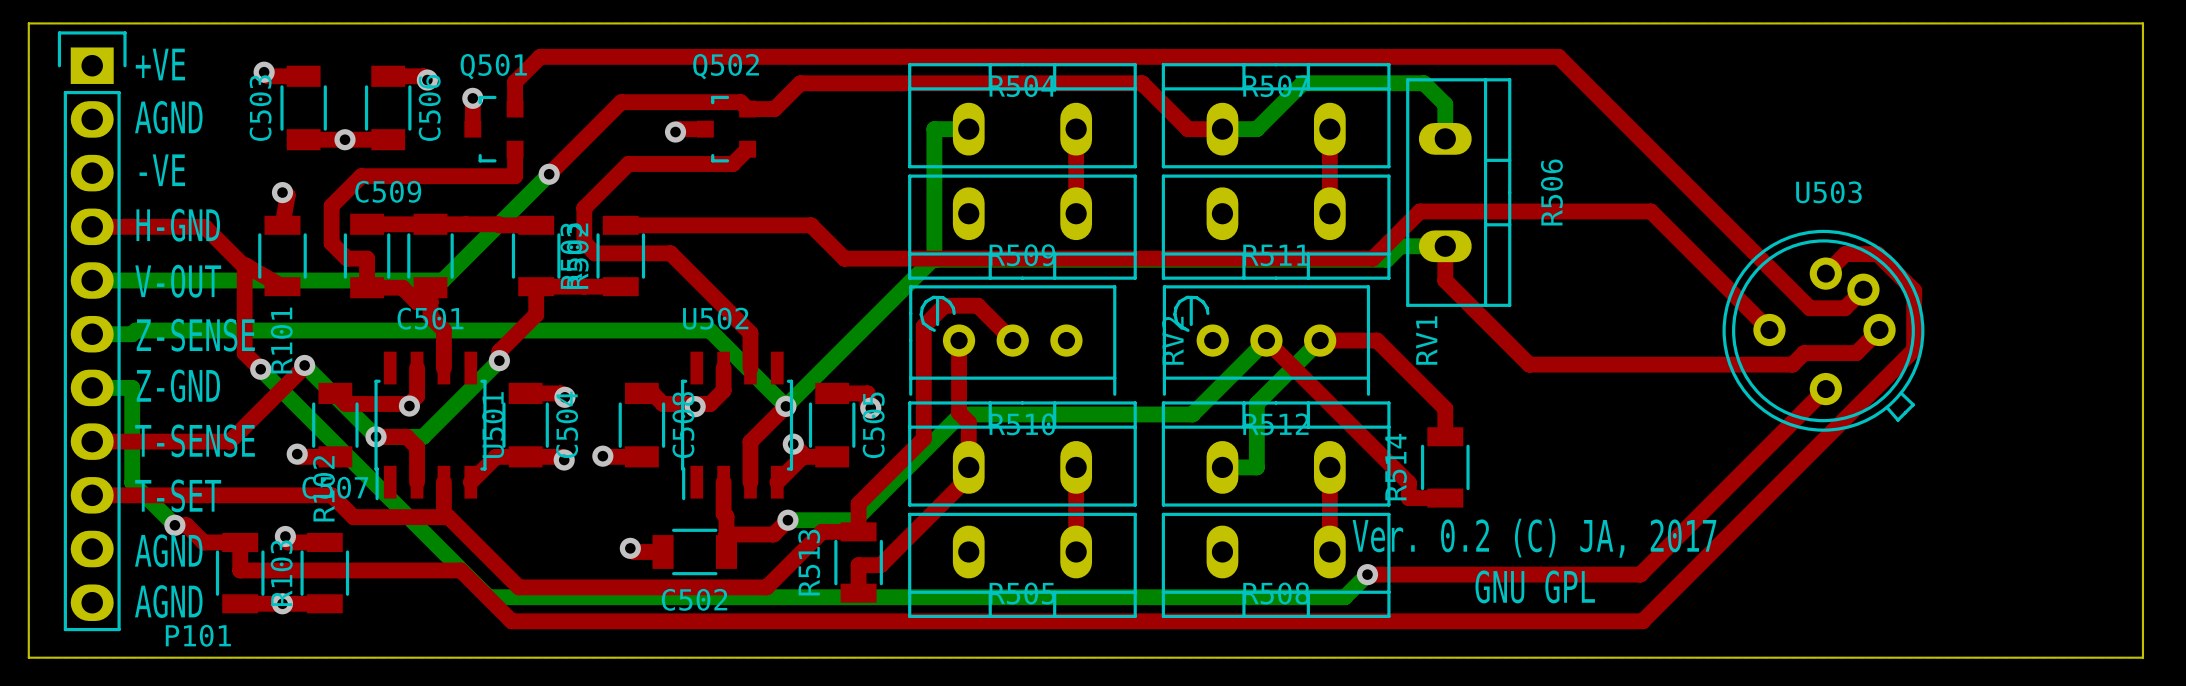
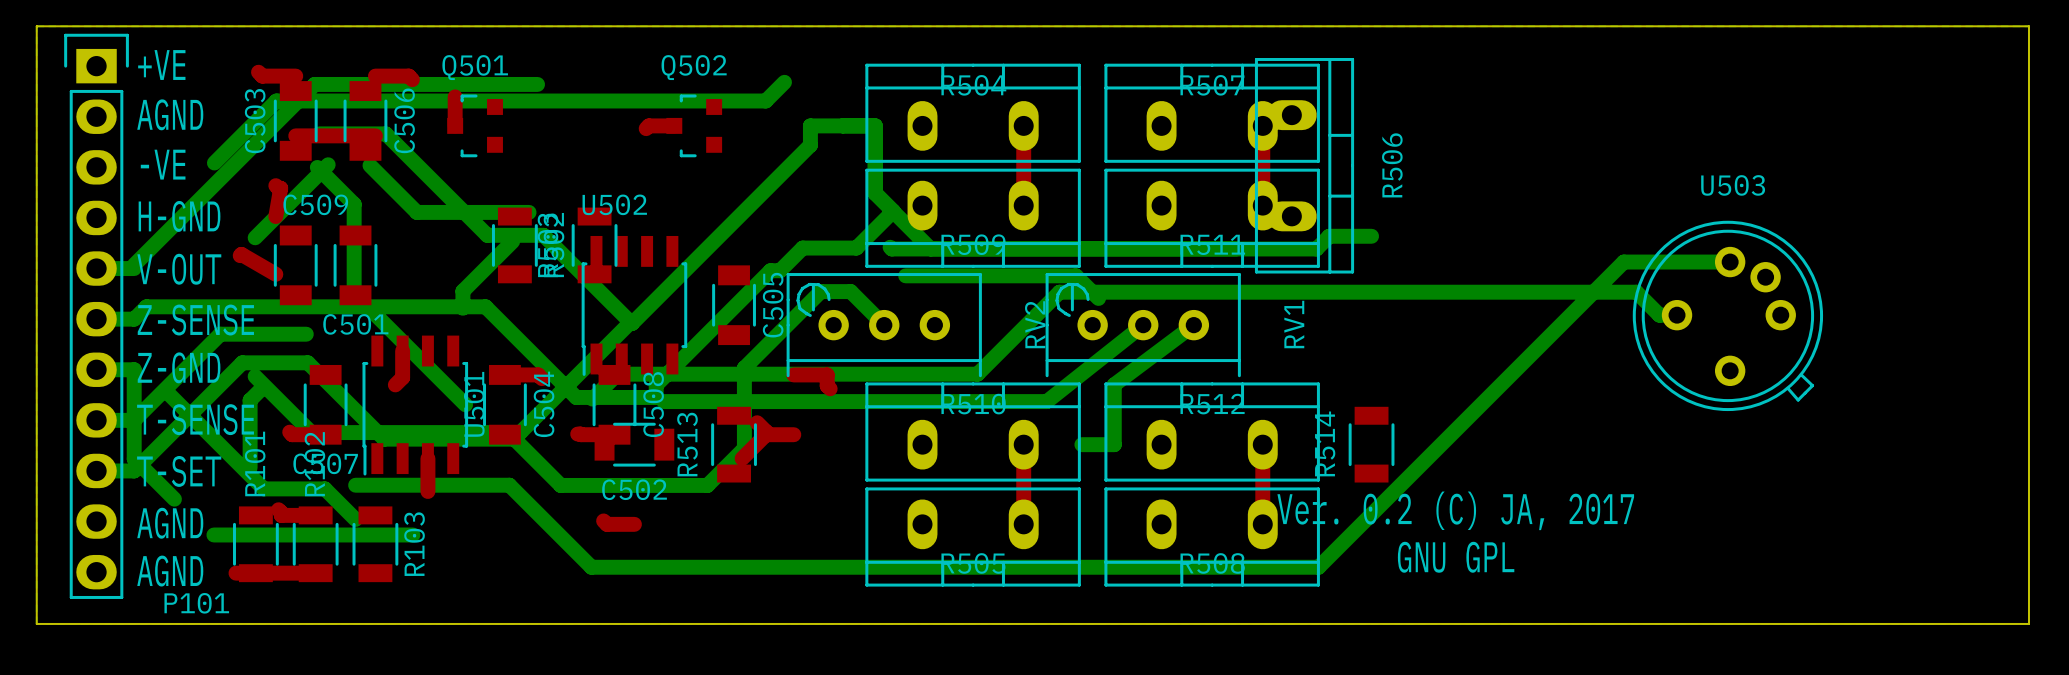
via: (264, 72) -> none
via: (427, 80) -> none
bottom track: none -> (784, 82) (765, 100) (276, 100) (214, 162)
bottom track: none -> (537, 84) (314, 84) (134, 264)
via: (472, 98) -> none
C503 position: (303, 108) -> (295, 120)
C506 position: (388, 108) -> (365, 120)
top track: (515, 109) (515, 82) (540, 56) (1558, 56) (1809, 308) (1844, 308) (1863, 289) -> none
bottom track: (968, 129) (934, 129) (934, 257) (785, 406) (710, 330) (135, 330) -> (875, 193) (893, 211) (856, 248) (802, 248) (780, 270) (770, 270) (656, 385) (656, 397) (576, 397) (485, 306) (146, 306) (137, 315)
top track: (1222, 129) (1188, 129) (1142, 83) (800, 83) (774, 109) (747, 109) (740, 102) (621, 102) (549, 174) -> none
bottom track: (1222, 129) (1256, 129) (1302, 83) (1424, 83) (1445, 104) (1445, 138) -> none
via: (675, 132) -> none
bottom track: none -> (319, 133) (385, 133) (487, 235) (543, 235) (631, 323)
via: (345, 139) -> none
top track: (515, 149) (515, 176) (361, 176) (331, 205) (331, 243) (347, 258) (367, 258) (367, 287) (402, 287) (417, 302) (430, 302) -> none
top track: (747, 149) (732, 163) (628, 163) (584, 208) (584, 242) (594, 253) (670, 253) (750, 333) (750, 368) -> none
bottom track: none -> (328, 164) (255, 237)
bottom track: none -> (370, 165) (416, 212) (529, 212)
bottom track: none -> (317, 167) (354, 204) (354, 293) (465, 404)
bottom track: (549, 174) (442, 280) (132, 280) -> none
via: (549, 174) -> none
via: (282, 192) -> none
R506 position: (1458, 192) -> (1304, 165)
top track: (367, 224) (536, 225) -> none
top track: (620, 225) (811, 225) (844, 258) (1372, 258) (1419, 211) (1650, 211) (1769, 329) -> none
top track: (92, 226) (204, 226) (244, 266) (244, 353) (260, 369) -> none
top track: (1445, 246) (1445, 280) (1529, 364) (1792, 364) (1804, 353) (1856, 353) (1879, 329) -> none
bottom track: none -> (512, 241) (462, 291) (462, 308)
R101 position: (282, 256) -> (255, 544)
C509 position: (367, 256) -> (295, 265)
C501 position: (430, 256) -> (355, 265)
bottom track: none -> (1236, 248) (930, 248) (875, 193) (875, 125) (810, 125) (810, 145) (520, 432) (311, 432) (255, 376)
top track: (1825, 273) (1845, 254) (1877, 254) (1914, 290) (1914, 349) (1642, 621) (511, 621) (460, 570) (240, 570) (240, 542) (203, 542) (186, 525) (174, 525) -> none
bottom track: none -> (1730, 262) (1623, 262) (1318, 567) (591, 567) (509, 485) (355, 485)
top track: (620, 286) (536, 286) (536, 314) (499, 351) (499, 360) -> none
top track: (430, 287) (430, 316) (443, 330) (443, 368) -> none
bottom track: none -> (905, 275) (1075, 275) (1098, 298)
bottom track: none -> (1677, 315) (1659, 315) (1636, 292) (1059, 292) (977, 374) (617, 374) (592, 399)
R101 name position: R101 (281, 340) -> R101 (255, 463)
bottom track: none -> (884, 325) (850, 291) (820, 291) (744, 368) (744, 448) (707, 485) (560, 485) (514, 439) (384, 439) (307, 362) (242, 362) (134, 470) (96, 470)
top track: (959, 340) (959, 412) (968, 422) (968, 477) (880, 565) (858, 565) (858, 593) -> none
top track: (1012, 340) (977, 305) (944, 305) (923, 326) (923, 438) (858, 503) (858, 531) (822, 531) (766, 587) (518, 587) (448, 517) (353, 517) (331, 495) (92, 495) -> none
RV2 position: (1012, 340) -> (884, 325)
bottom track: none -> (1143, 325) (1046, 401) (663, 401)
bottom track: none -> (1193, 325) (1114, 384) (1114, 444) (1081, 444)
top track: (1266, 340) (1408, 482) (1408, 498) (1445, 498) -> none
bottom track: (1266, 340) (1192, 414) (960, 414) (854, 520) (787, 520) -> none
RV1 position: (1266, 340) -> (1143, 325)
top track: (1320, 340) (1377, 340) (1445, 408) (1445, 436) -> none
bottom track: (1320, 340) (1256, 403) (1256, 467) (1222, 467) -> none
bottom track: none -> (306, 334) (220, 334) (134, 420) (96, 420)
bottom track: (499, 360) (423, 436) (376, 436) (304, 365) -> none
via: (499, 360) -> none
top track: (304, 365) (229, 441) (92, 441) -> none
via: (304, 365) -> none
top track: (723, 368) (723, 390) (710, 403) (663, 403) (652, 393) (641, 393) -> none
bottom track: (260, 369) (488, 597) (1344, 597) (1367, 574) -> none
via: (260, 369) -> none
top track: (1825, 389) (1640, 574) (1367, 574) -> none
top track: (335, 393) (345, 403) (409, 403) (409, 406) -> none
via: (564, 397) -> none
via: (409, 406) -> none
via: (695, 406) -> none
top track: (785, 406) (750, 441) (750, 482) -> none
via: (785, 406) -> none
via: (870, 408) -> none
bottom track: none -> (165, 390) (263, 488) (324, 488) (355, 519)
bottom track: none -> (259, 390) (250, 400) (250, 467)
U502 position: (737, 425) -> (634, 305)
C505 position: (832, 425) -> (734, 305)
top track: (376, 436) (406, 436) (417, 447) (417, 482) -> none
via: (376, 436) -> none
via: (793, 444) -> none
via: (297, 454) -> none
via: (602, 456) -> none
top track: (564, 459) (561, 456) (496, 456) (470, 482) -> none
via: (564, 459) -> none
top track: (723, 482) (726, 551) -> none
top track: (787, 520) (773, 534) (726, 534) -> none
via: (787, 520) -> none
via: (174, 525) -> none
via: (285, 536) -> none
via: (630, 548) -> none
C502 position: (694, 551) -> (634, 444)
R513 position: (858, 562) -> (734, 444)
bottom track: none -> (213, 534) (412, 534)
R103 position: (240, 573) -> (375, 544)
via: (1367, 574) -> none
via: (282, 603) -> none

